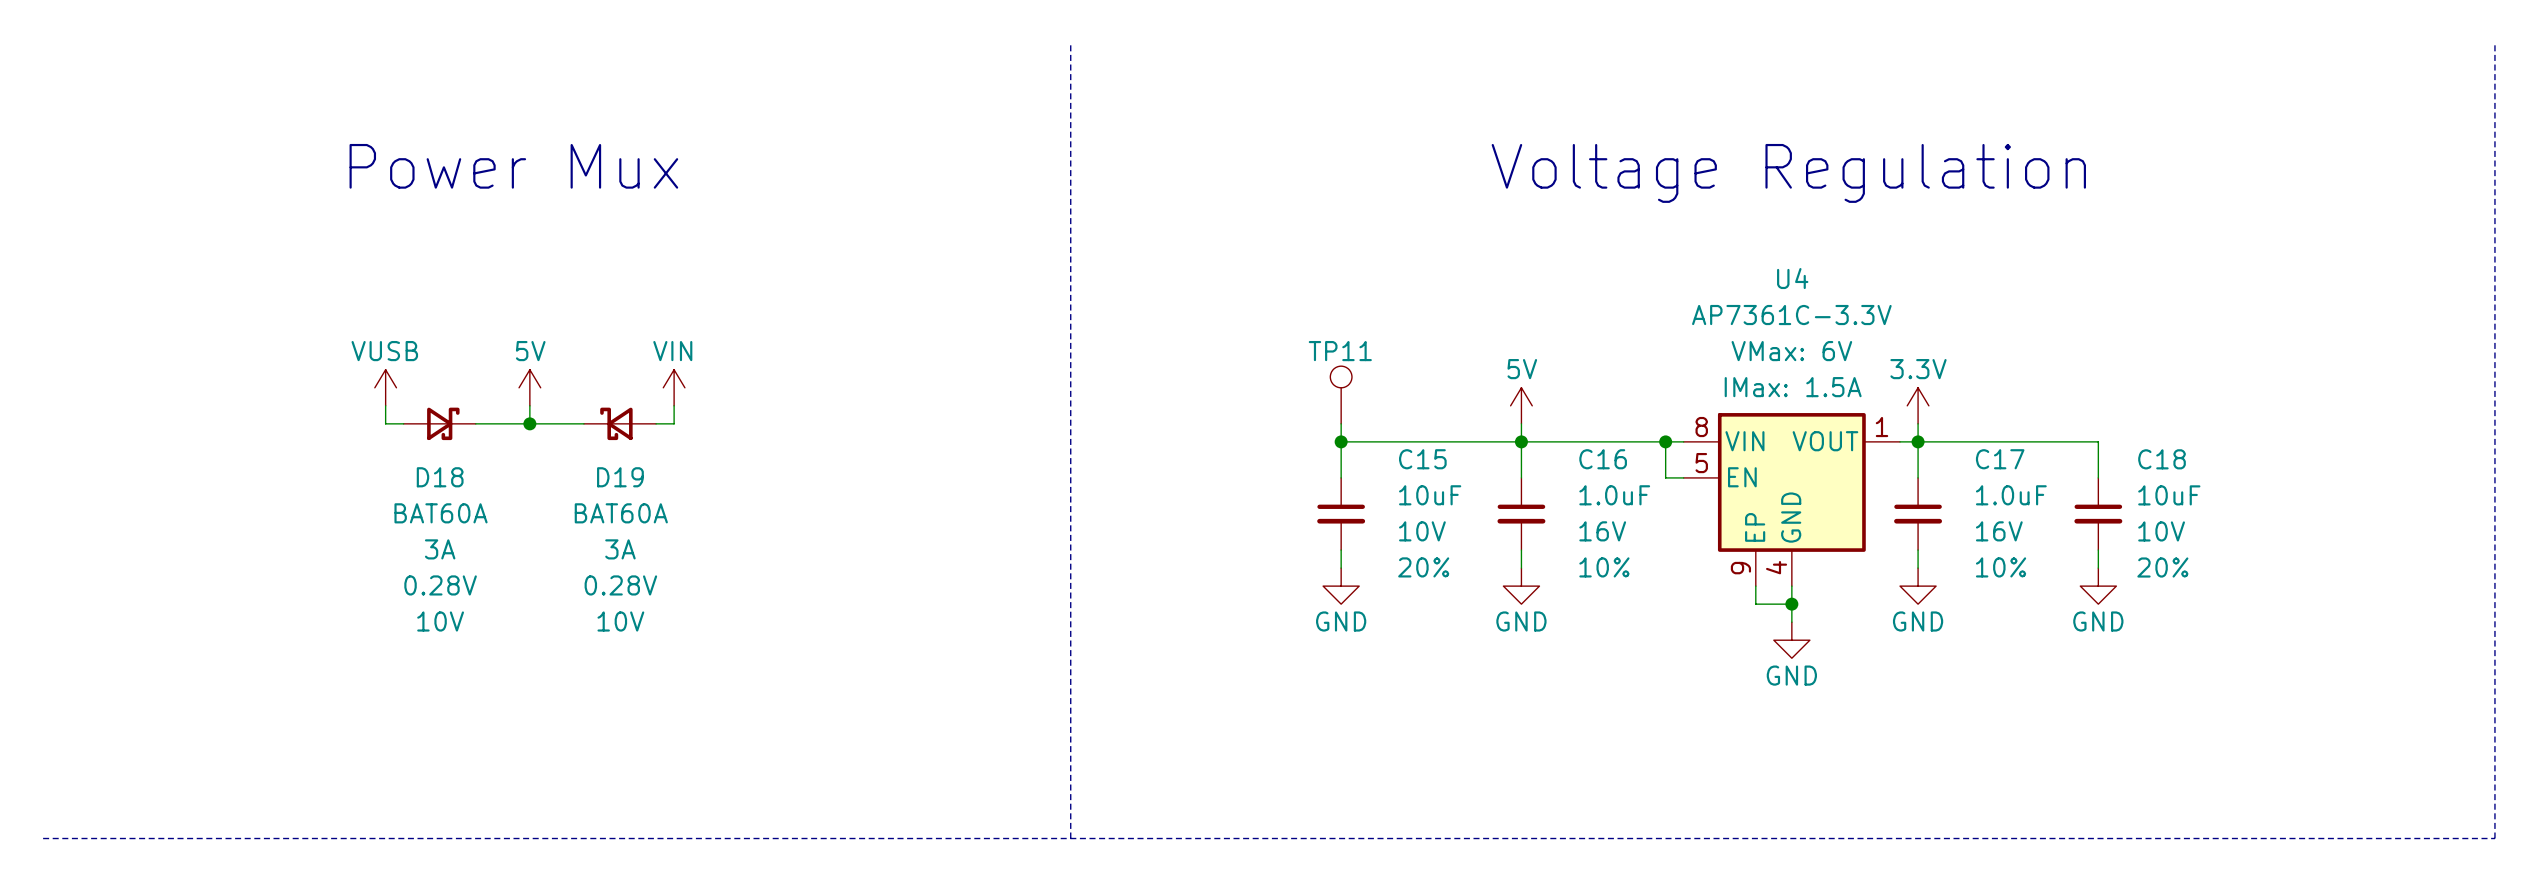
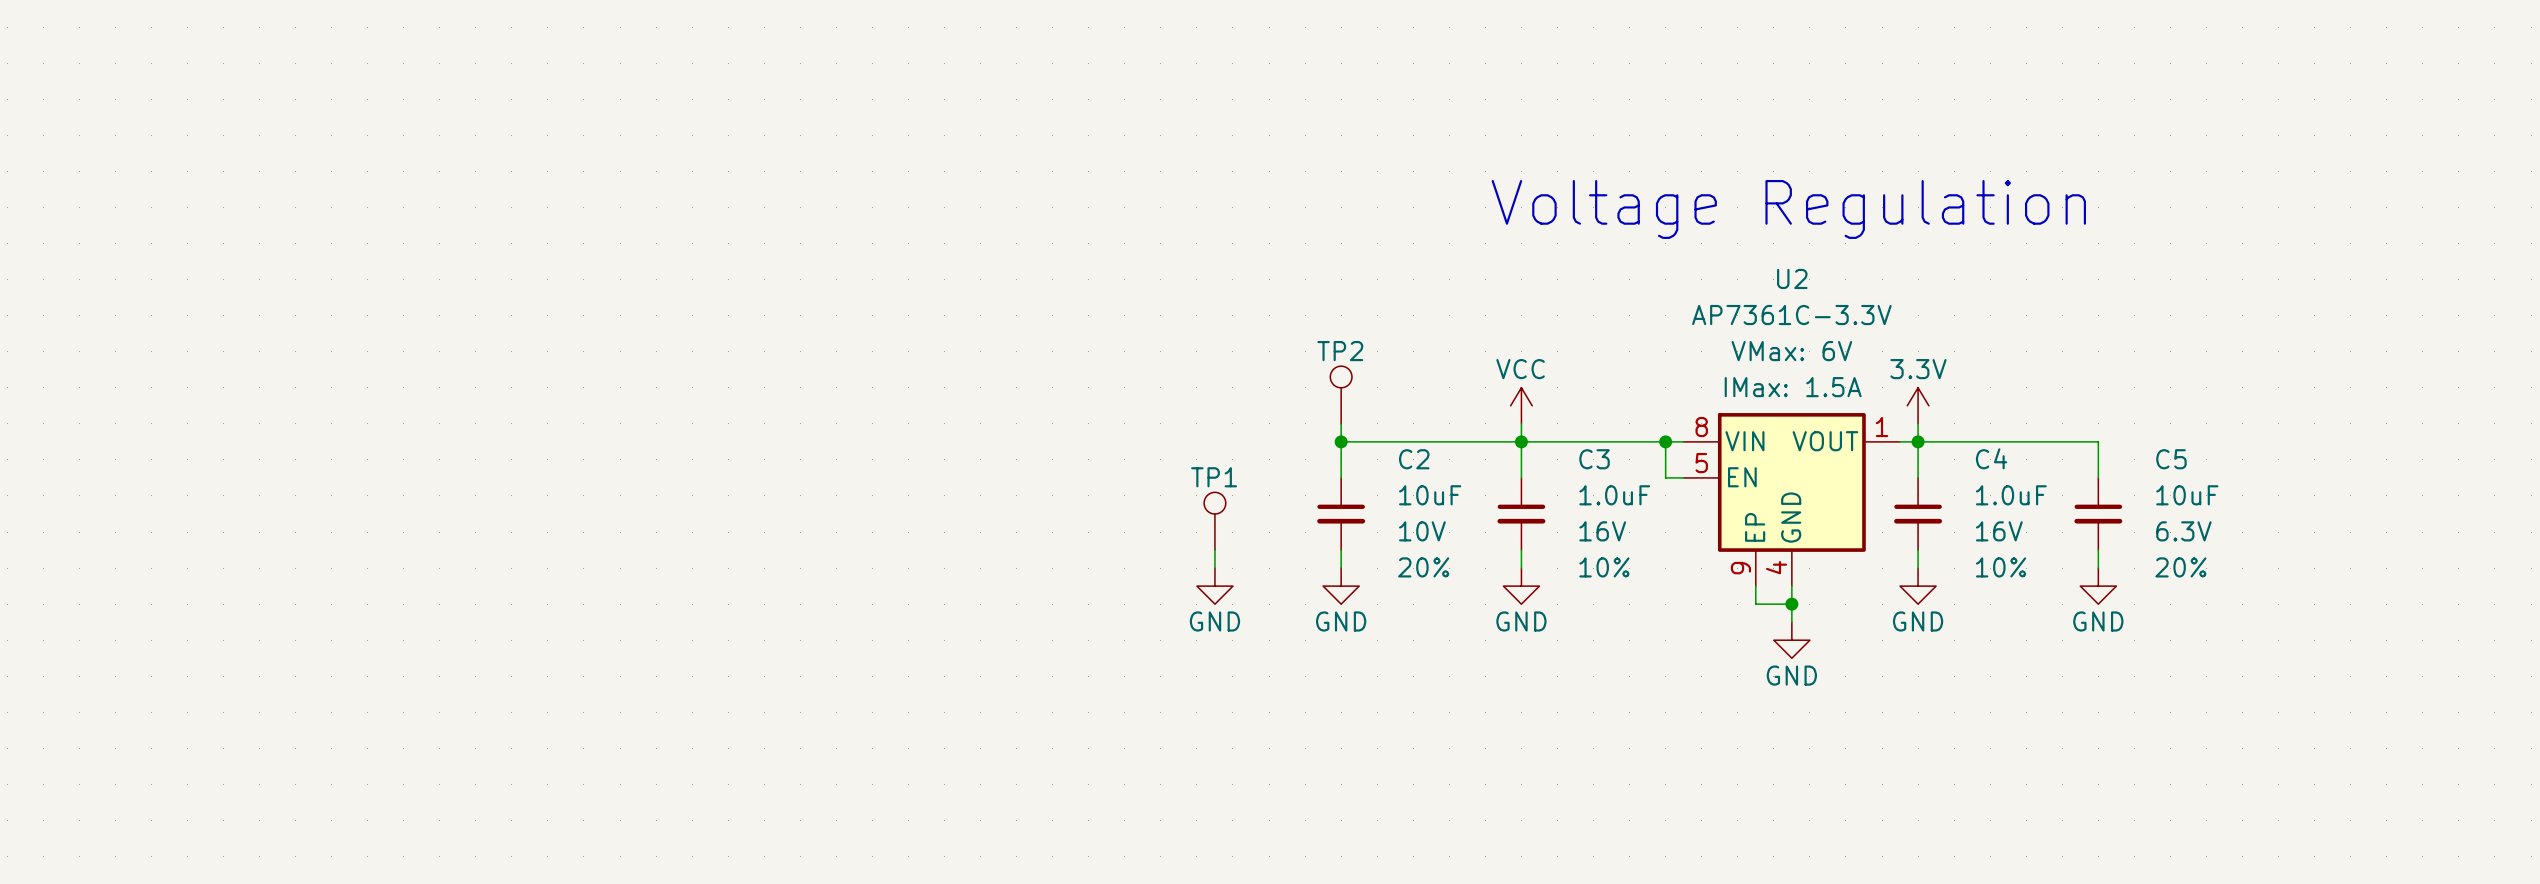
line: (1070, 45) (1070, 838) -> none
line: (2494, 45) (2494, 838) (43, 838) -> none
text: Power Mux (513, 166) -> none
text position: Voltage Regulation (1788, 173) -> Voltage Regulation (1788, 209)
U4 name: U4 (1792, 278) -> U2 (1792, 278)
TP11 name: TP11 (1340, 351) -> TP2 (1340, 351)
power symbol: VUSB (385, 387) -> none
power symbol: 5V (529, 387) -> none
power symbol: VIN (674, 387) -> none
wire: (385, 405) (385, 423) (403, 423) -> none
wire: (529, 405) (529, 423) -> none
wire: (674, 405) (674, 423) (656, 423) -> none
power symbol: 5V (1521, 405) -> VCC (1521, 405)
D18: BAT60A (439, 423) -> none
wire: (475, 423) (583, 423) -> none
junction: (529, 423) -> none
D19: BAT60A (620, 423) -> none
C15 name: C15 (1422, 459) -> C2 (1414, 459)
C16 name: C16 (1603, 459) -> C3 (1594, 459)
C17 name: C17 (2000, 459) -> C4 (1991, 458)
C18 name: C18 (2162, 459) -> C5 (2171, 459)
C18 value position: 10uF (2169, 495) -> 10uF (2187, 495)
TP1: none -> (1214, 521)
C18 text: 10V (2161, 531) -> 6.3V (2183, 531)
wire: none -> (1214, 550) (1214, 568)
C18 text position: 20% (2162, 567) -> 20% (2180, 567)
power symbol: none -> GND (1214, 586)

